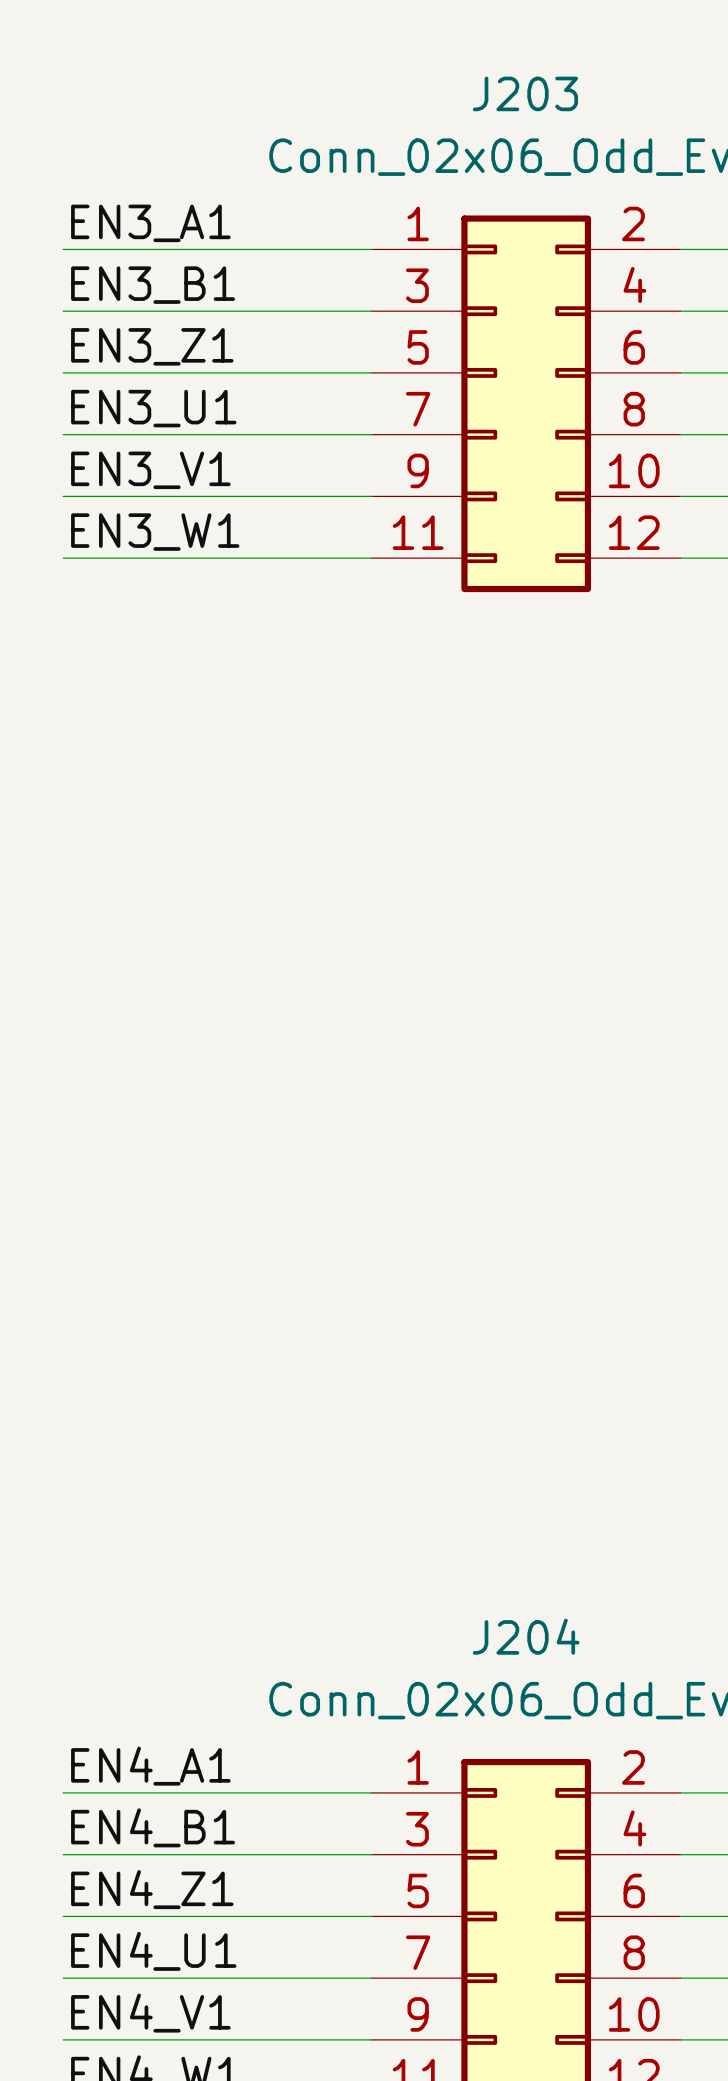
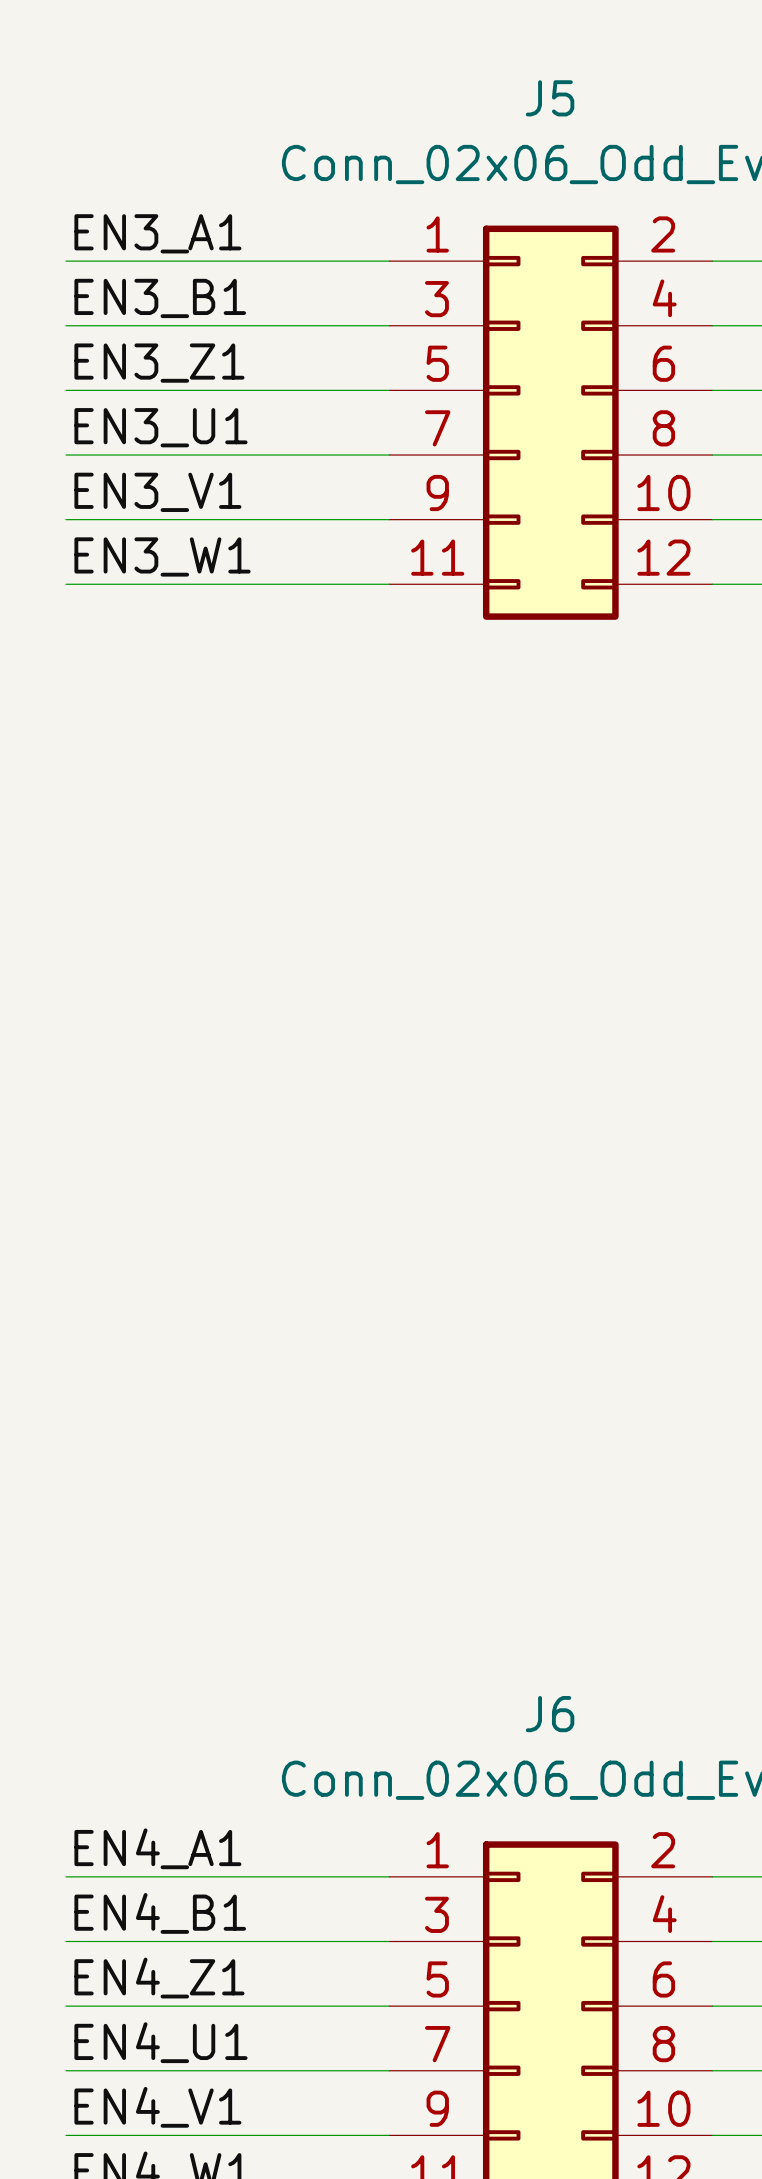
J203 name: J203 (525, 93) -> J5 (550, 98)
J204 name: J204 (526, 1636) -> J6 (550, 1714)

